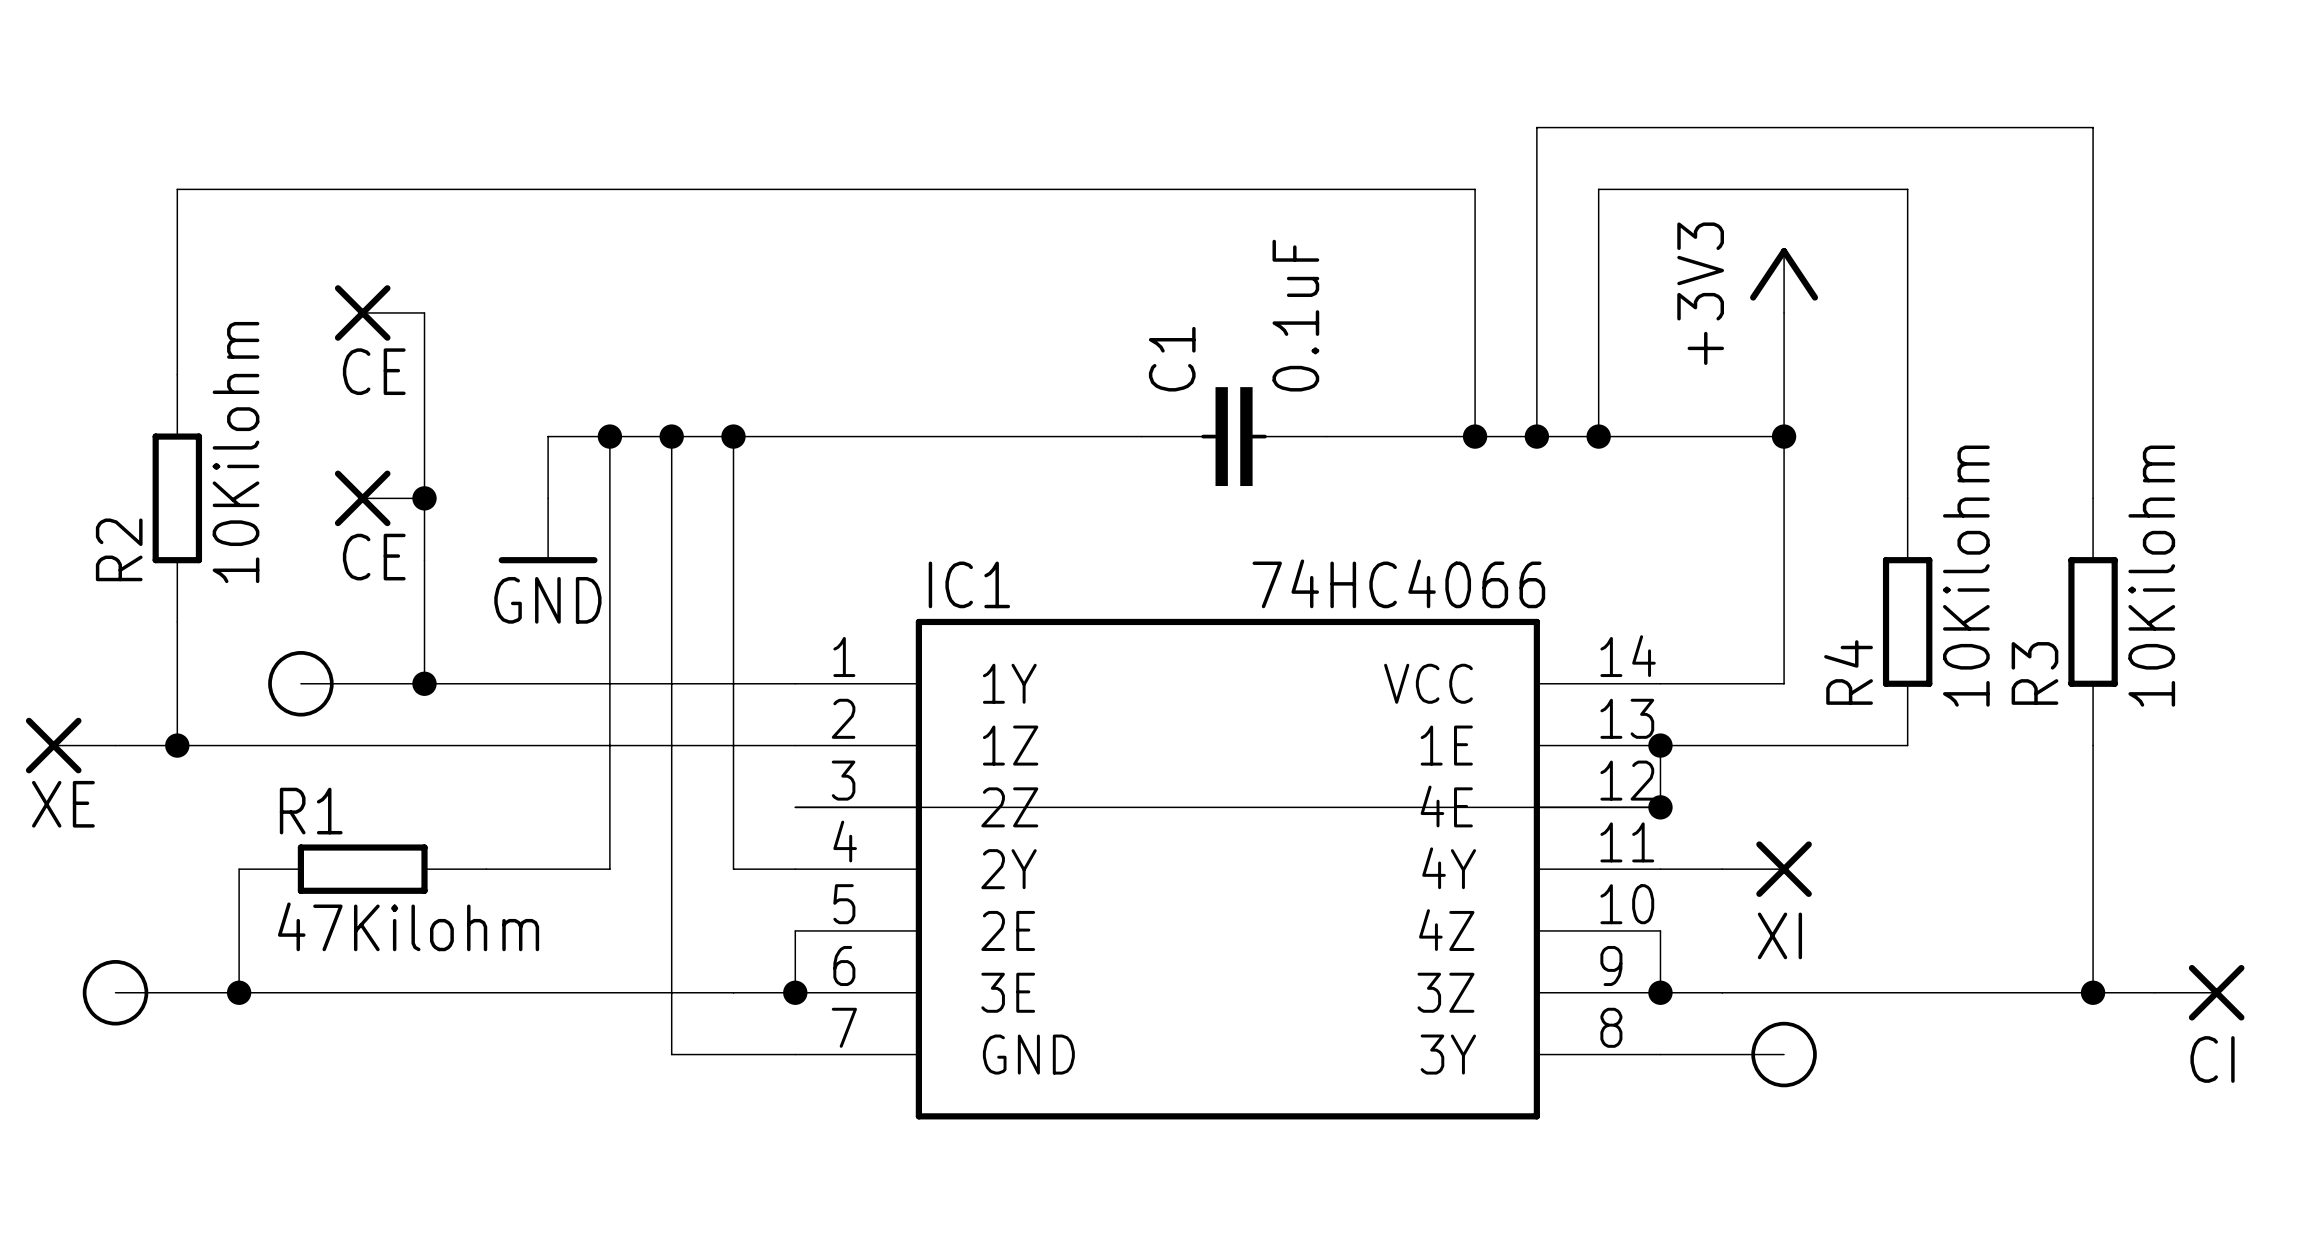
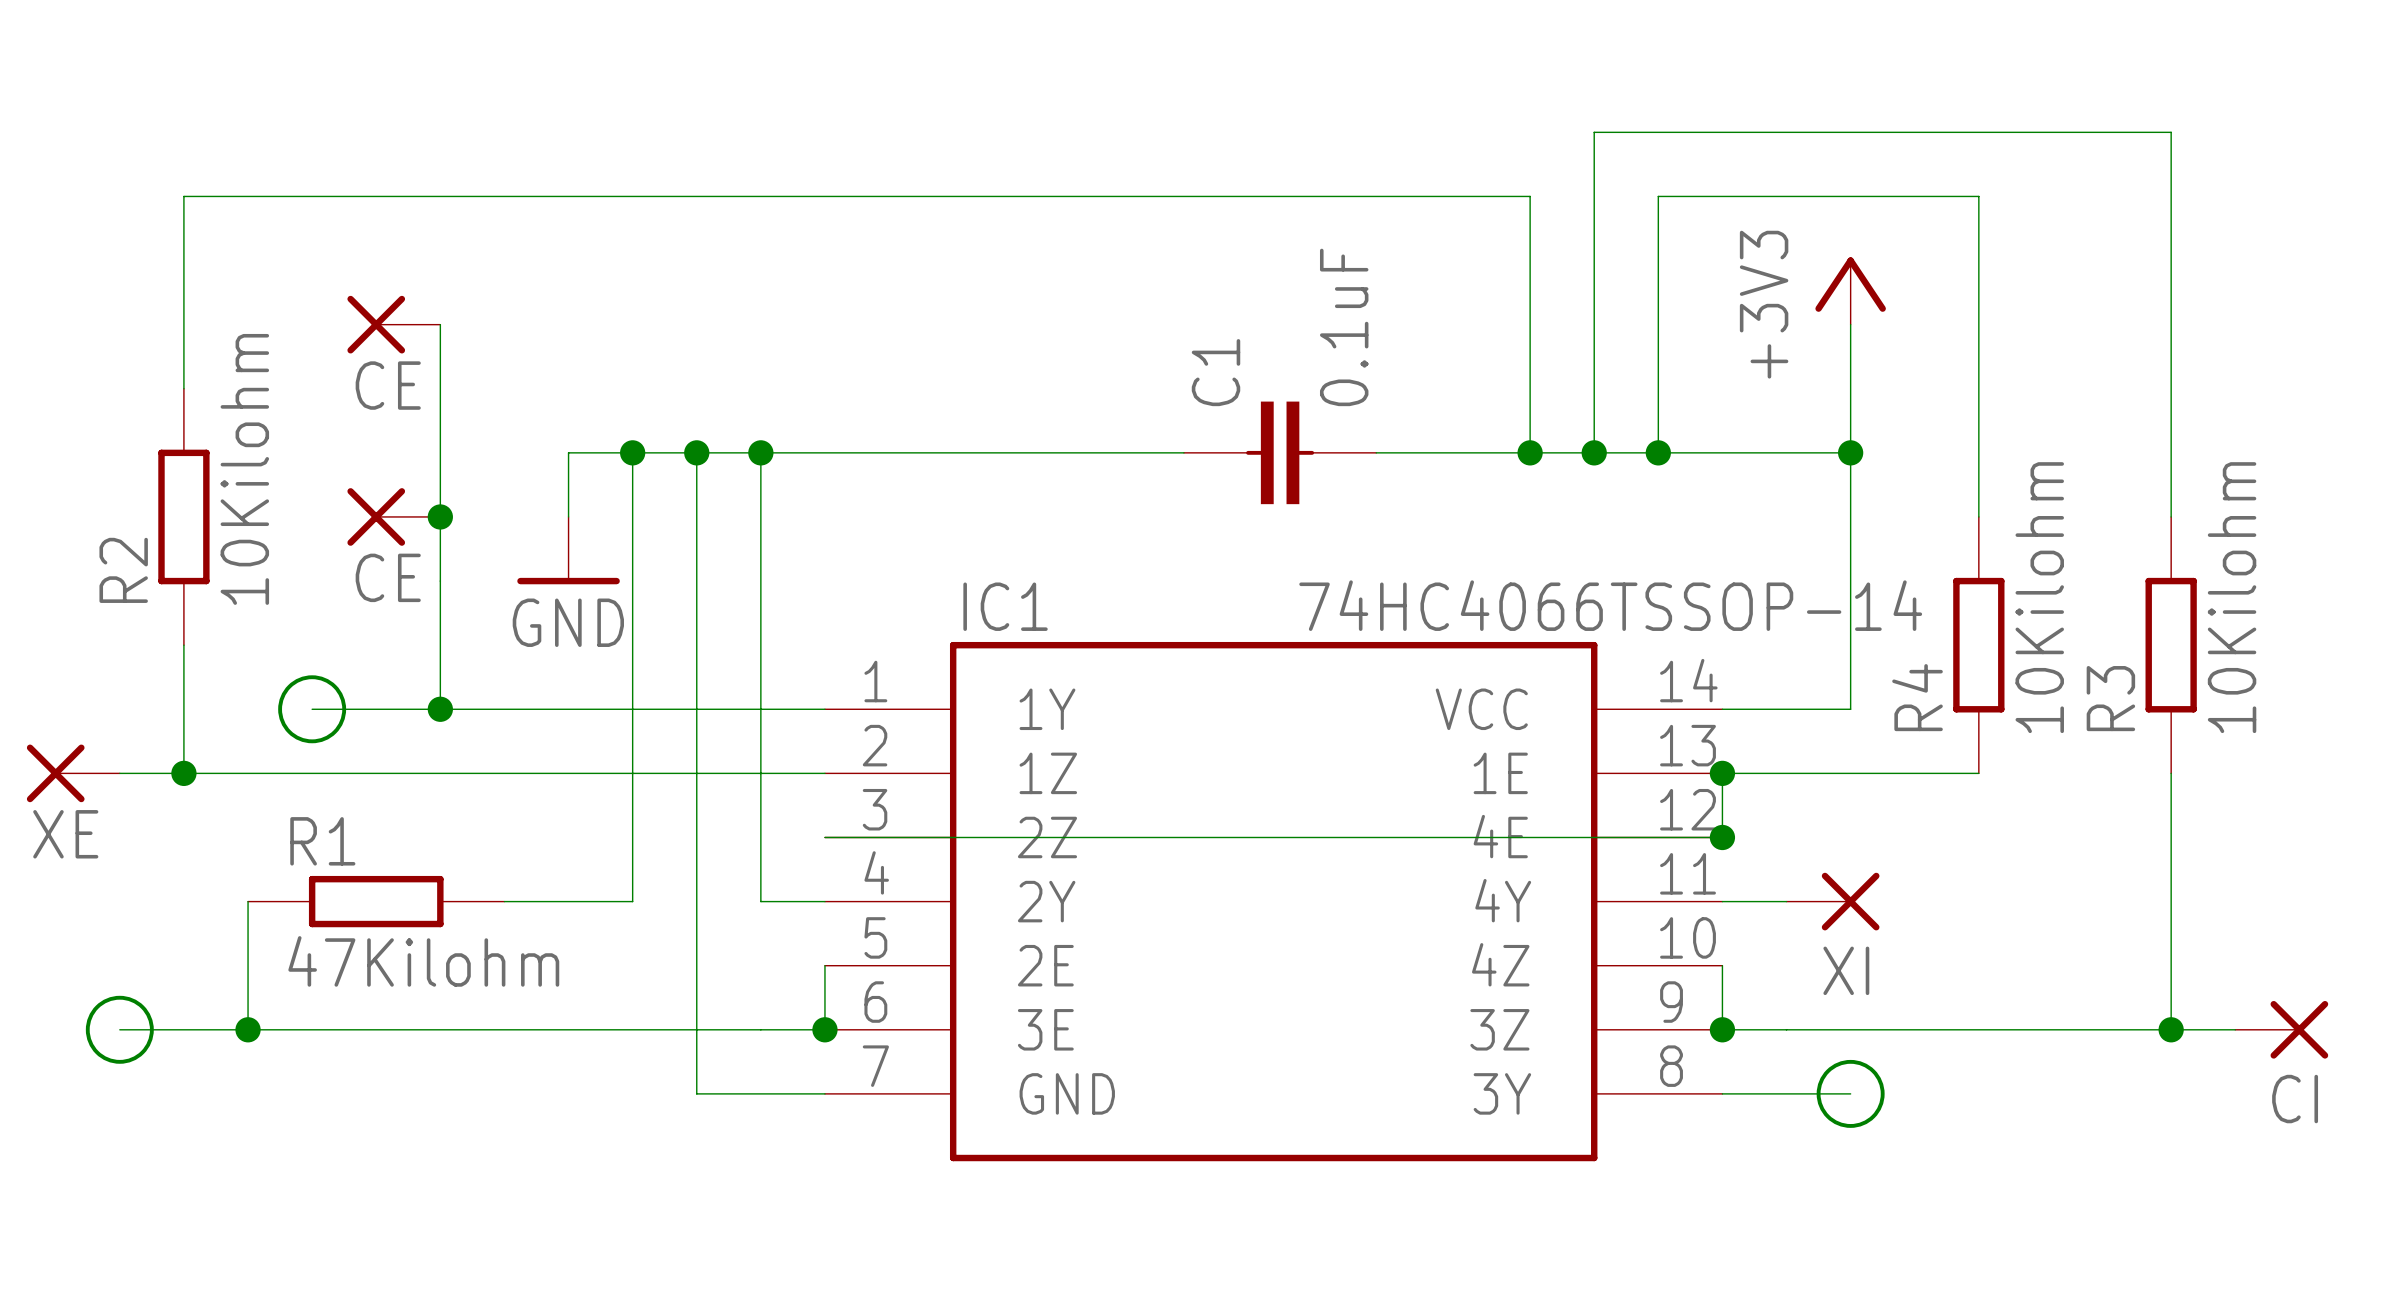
IC1 value: 74HC4066 (1398, 583) -> 74HC4066TSSOP-14 (1610, 605)

